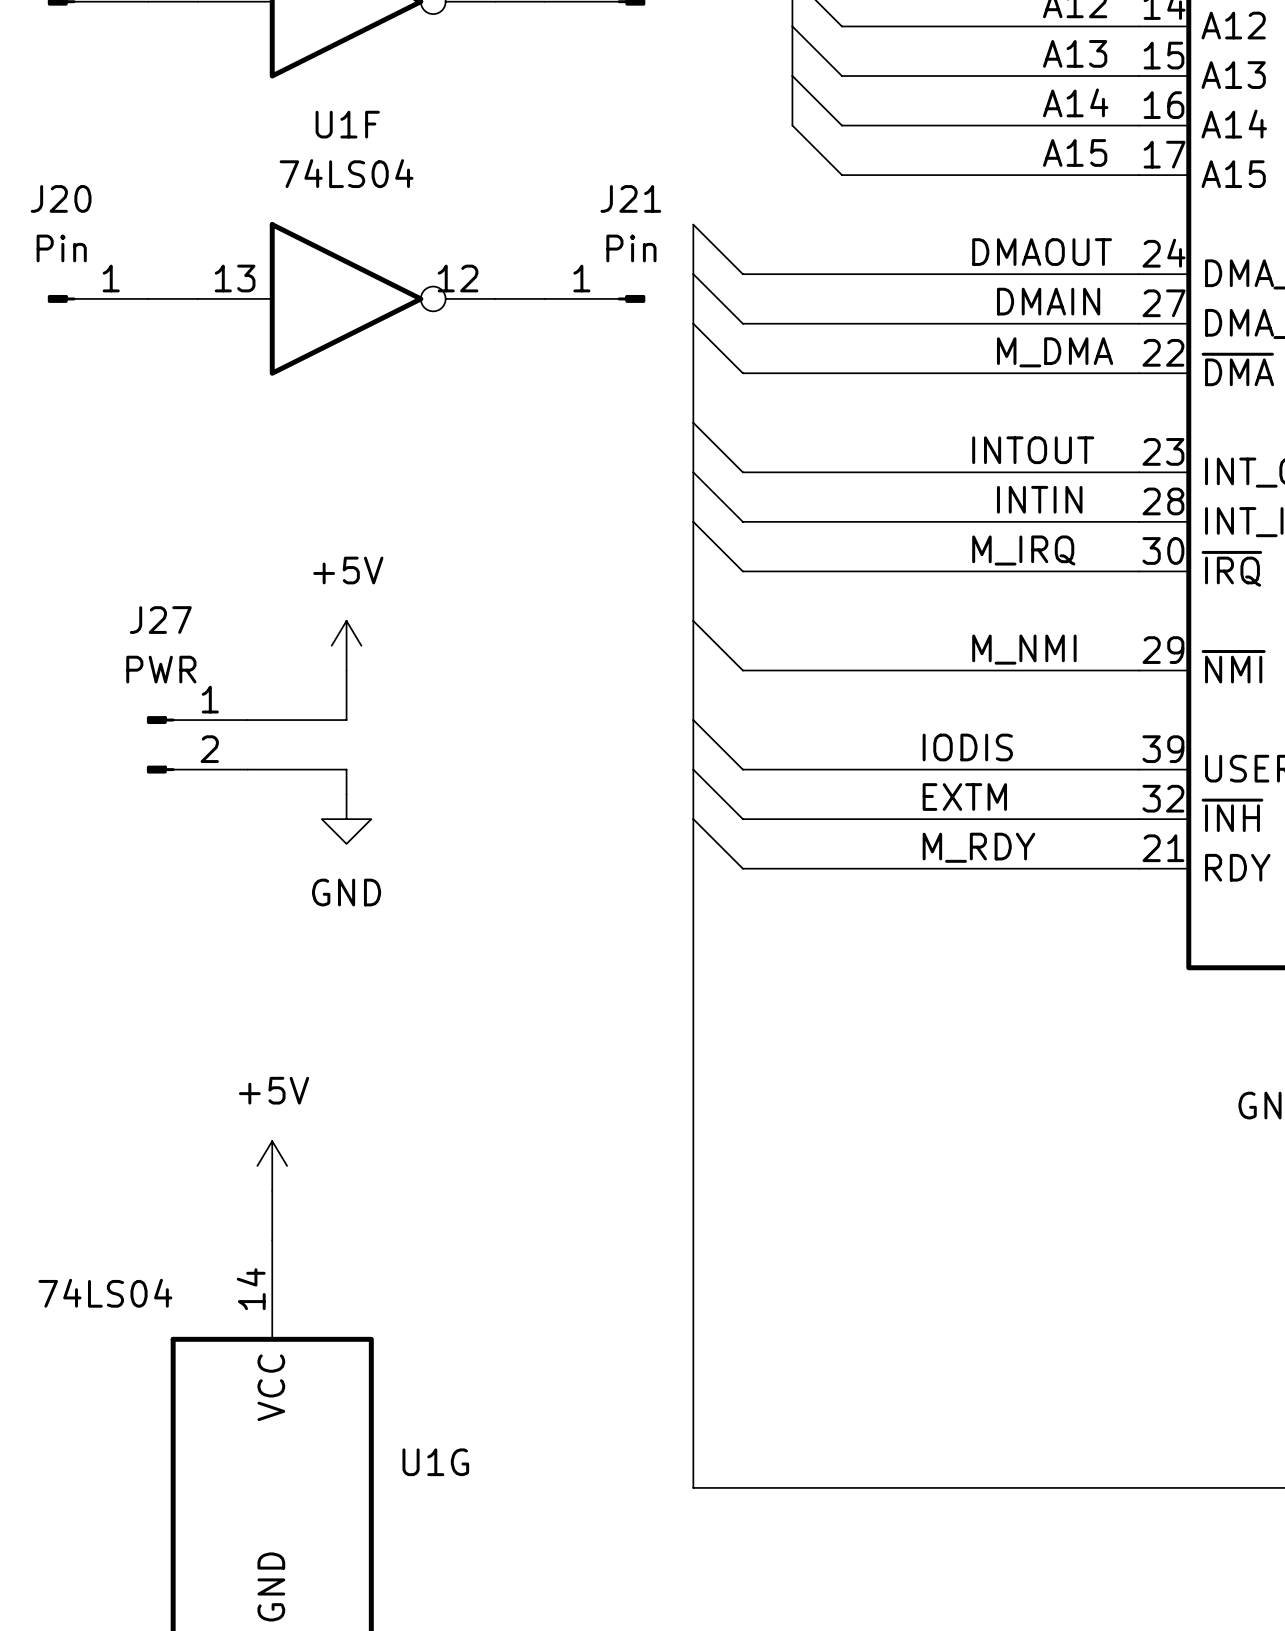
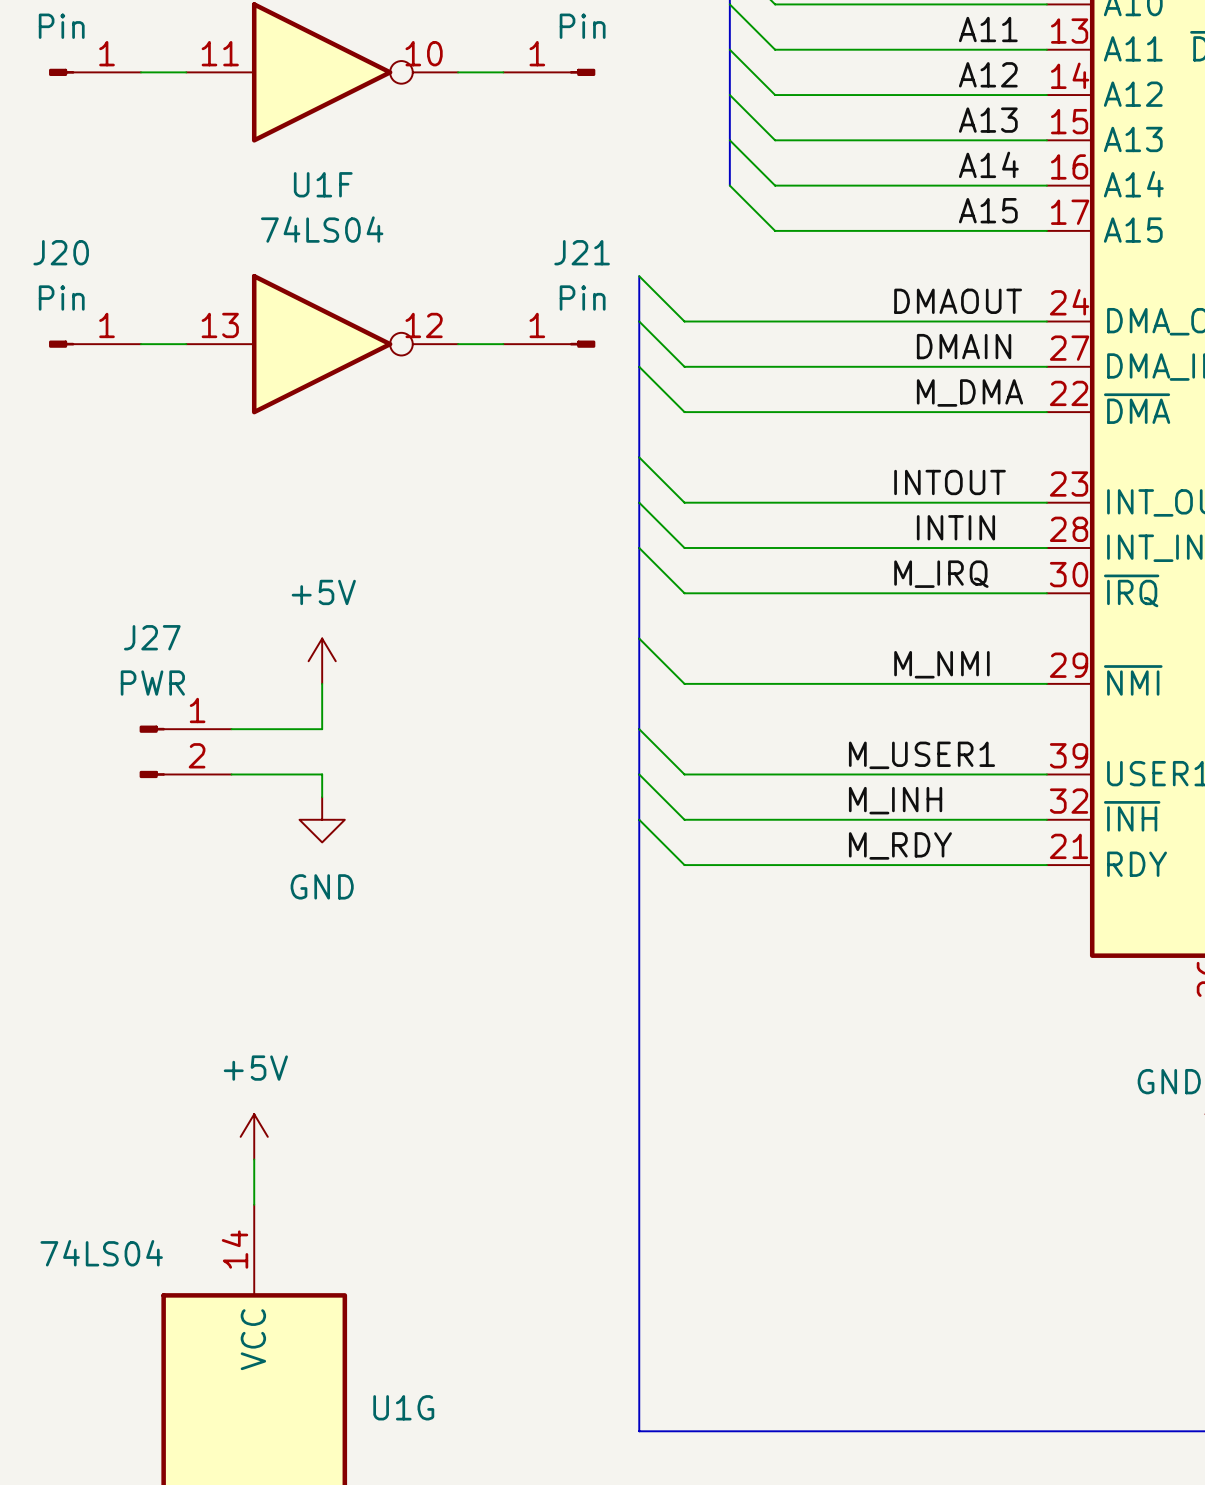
label: IODIS (967, 747) -> M_USER1 (921, 755)
label: EXTM (964, 797) -> M_INH (895, 800)

